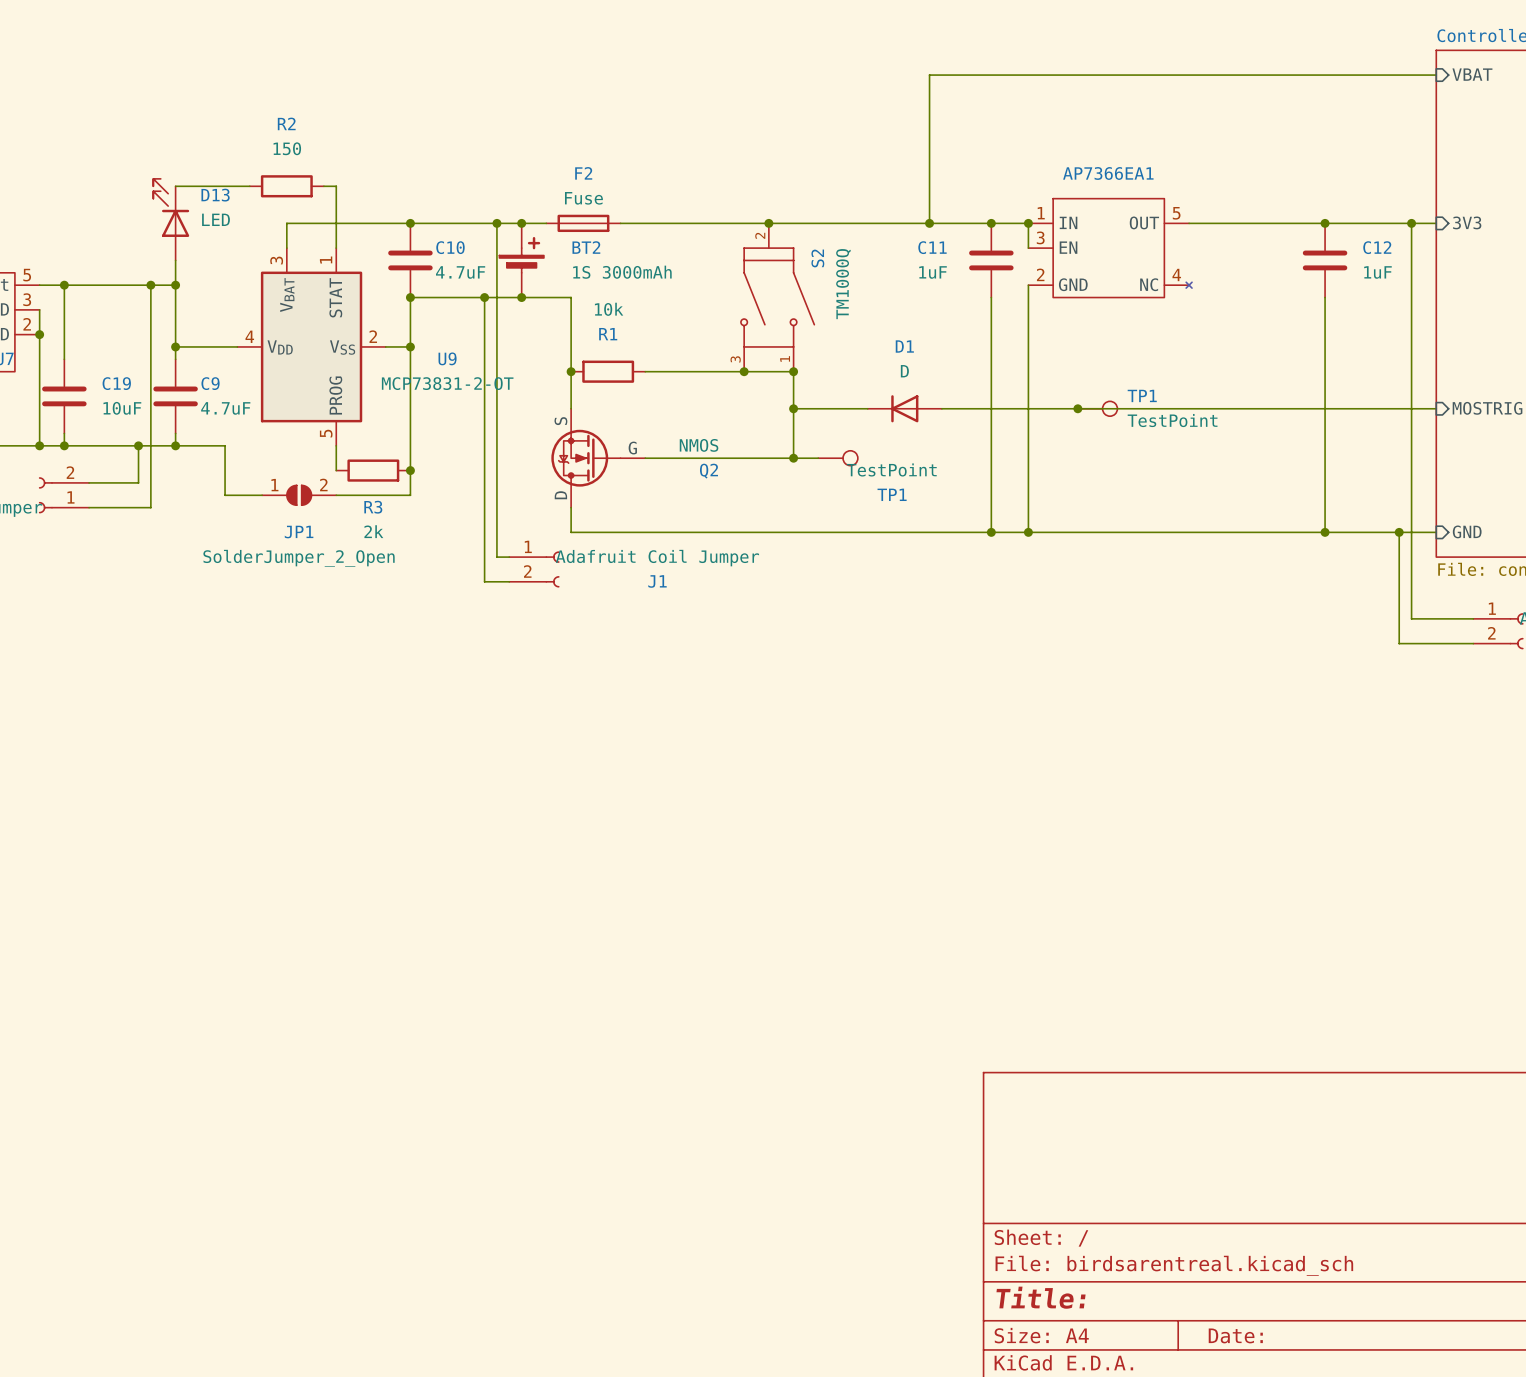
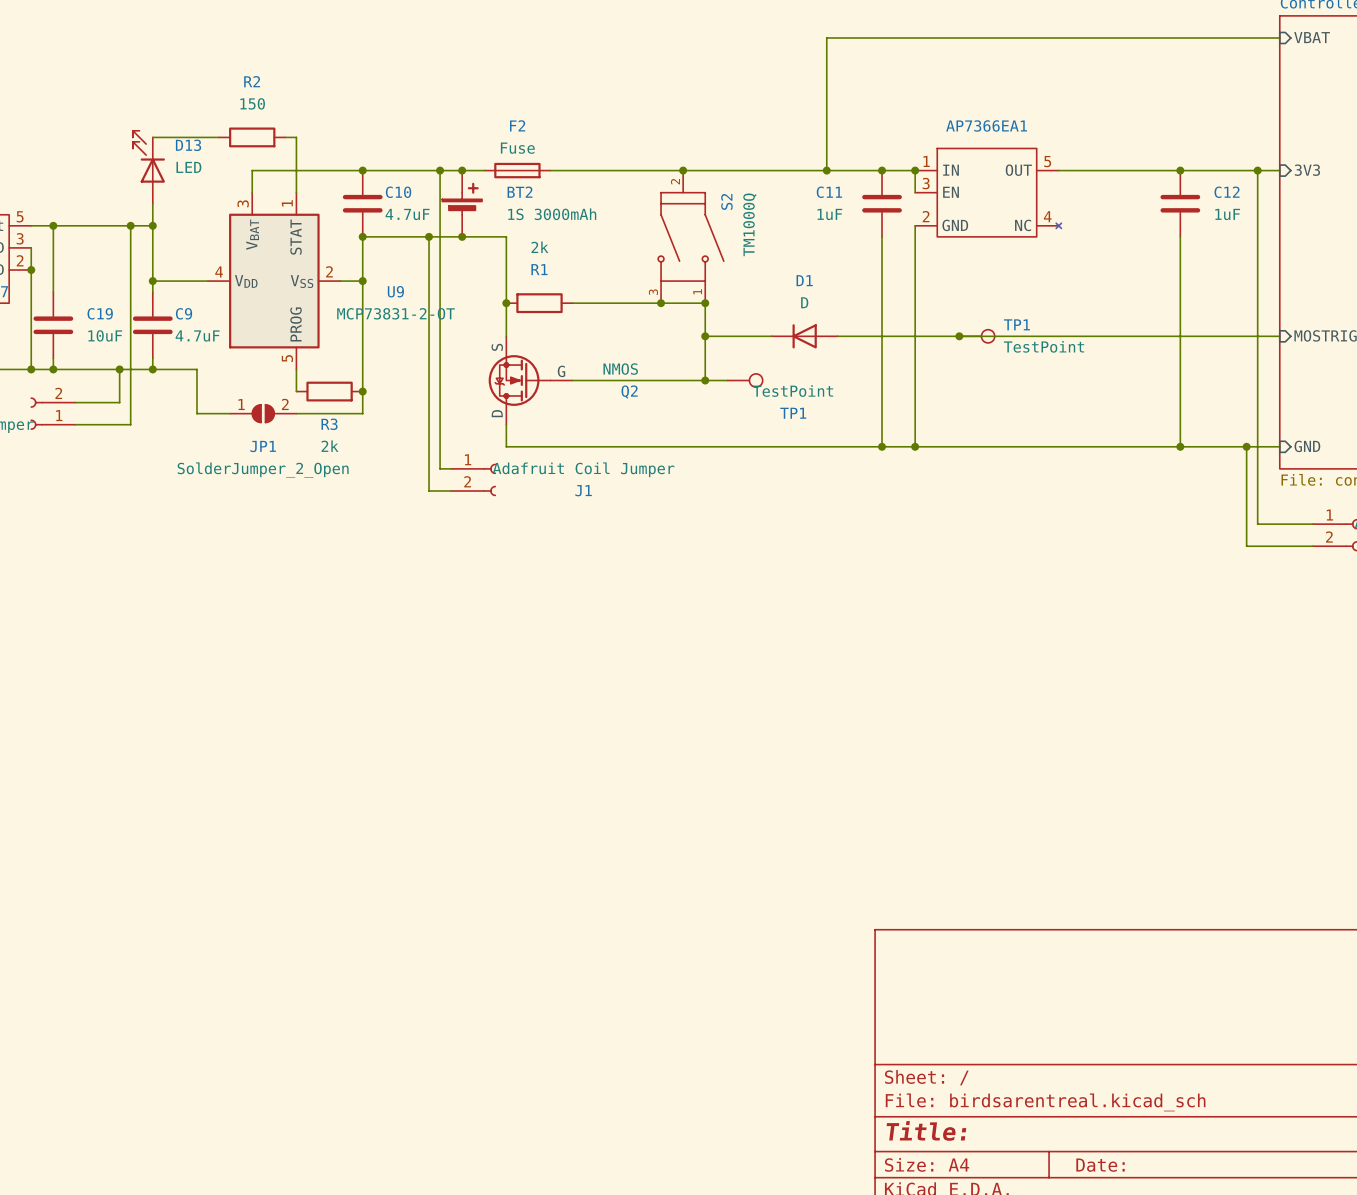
R1 value: 10k (609, 309) -> 2k (539, 247)

